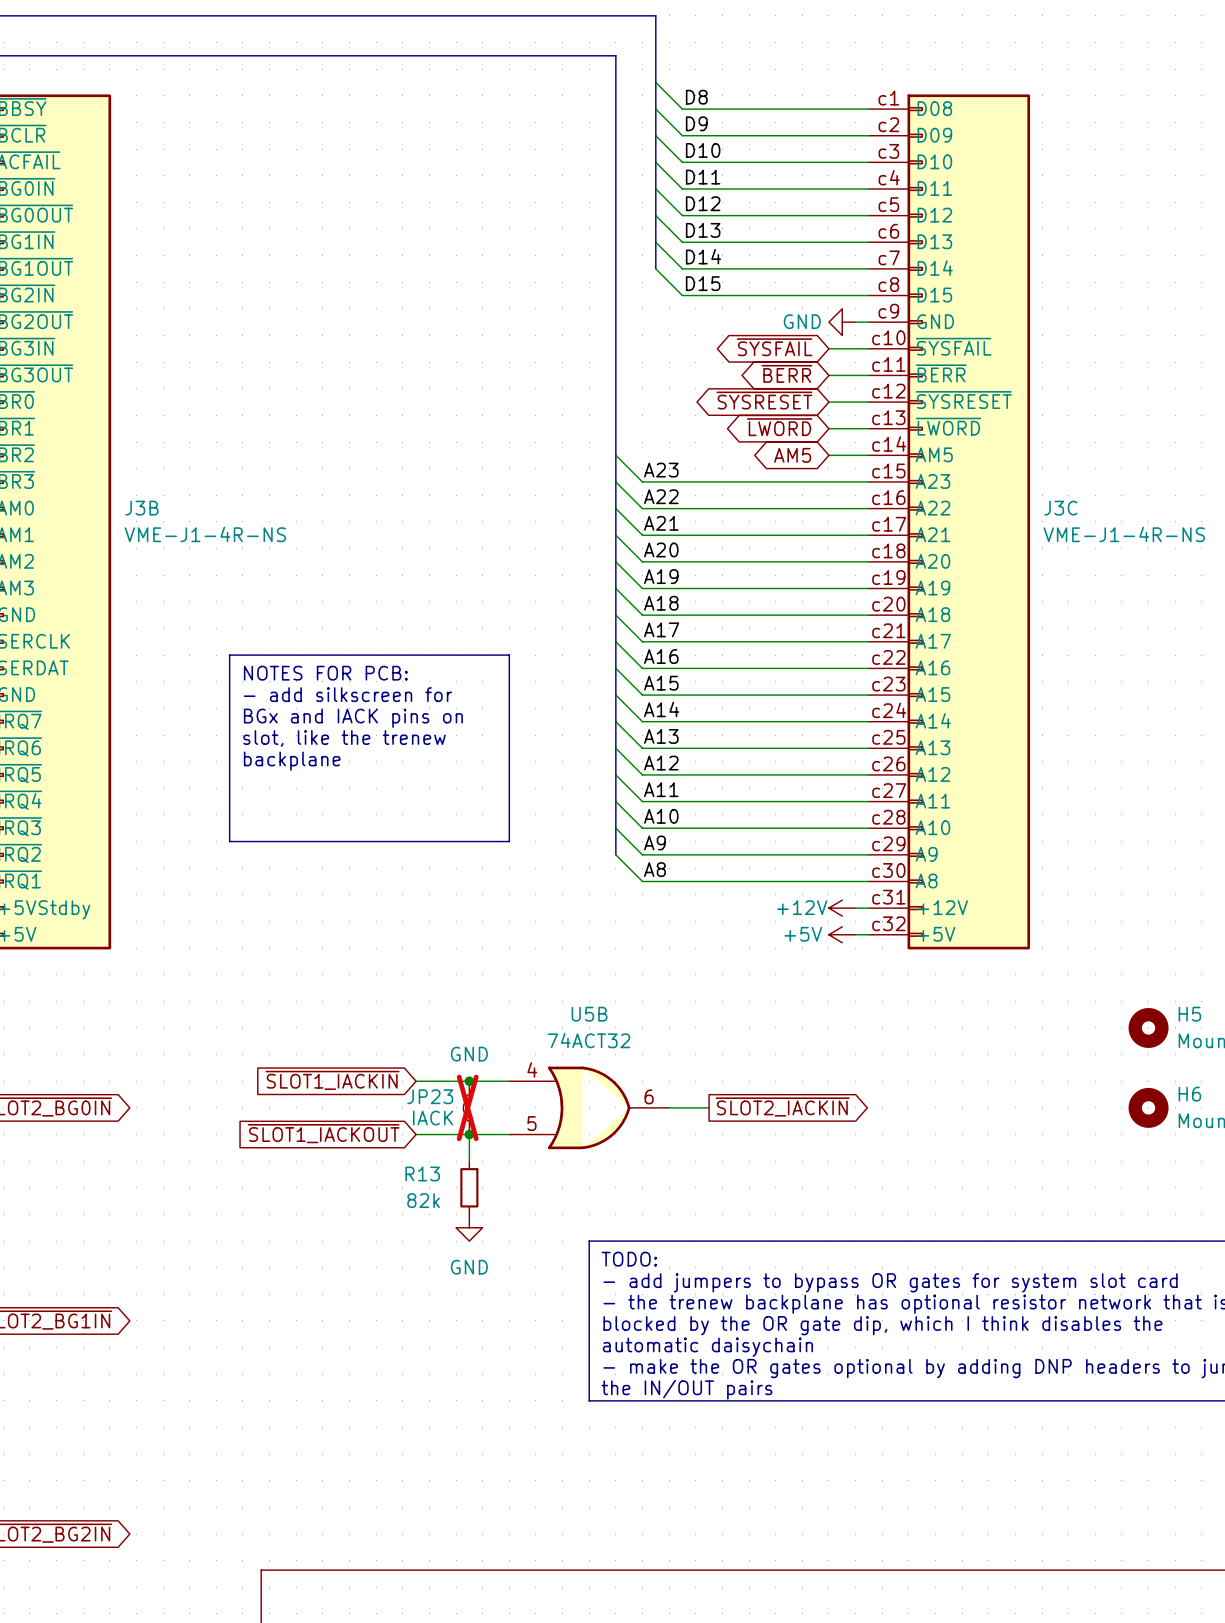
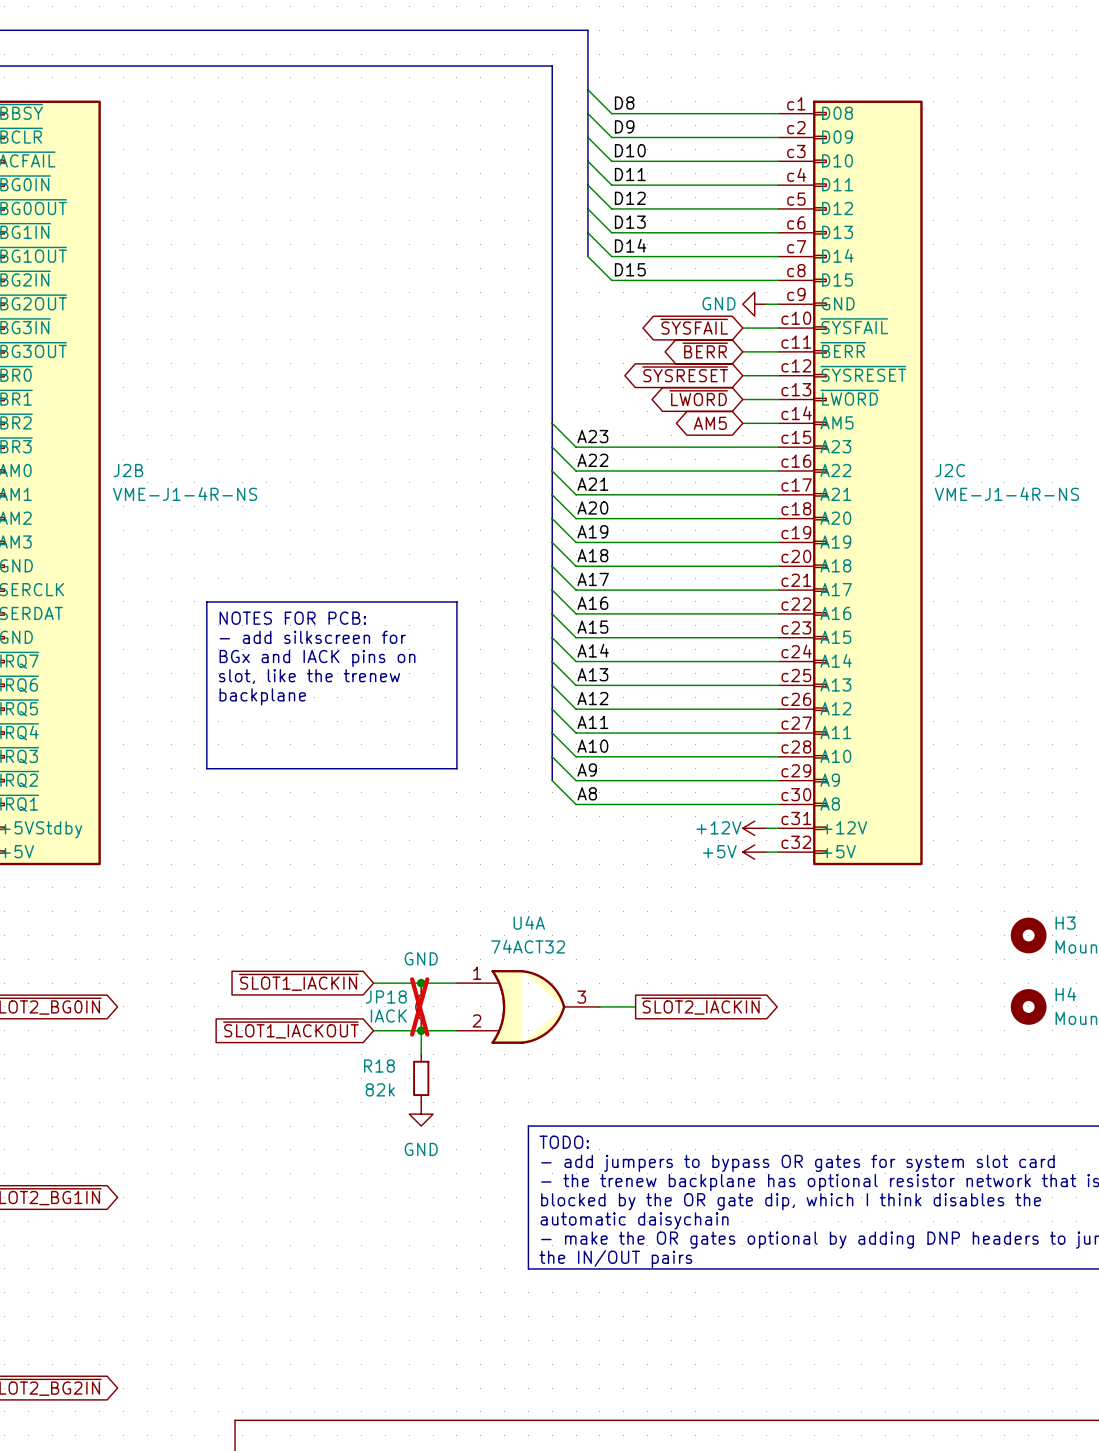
J3B name: J3B (141, 508) -> J2B (128, 470)
J3C name: J3C (1060, 508) -> J2C (950, 470)
U5B name: U5B (589, 1014) -> U4A (529, 922)
H5 name: H5 (1189, 1014) -> H3 (1065, 923)
U5B pin number: 4 (532, 1069) -> 1 (477, 973)
H6 name: H6 (1189, 1094) -> H4 (1065, 994)
JP23 name: JP23 (430, 1096) -> JP18 (386, 996)
U5B pin number: 6 (649, 1096) -> 3 (581, 997)
U5B pin number: 5 (531, 1123) -> 2 (476, 1020)
R13 name: R13 (422, 1173) -> R18 (379, 1066)

